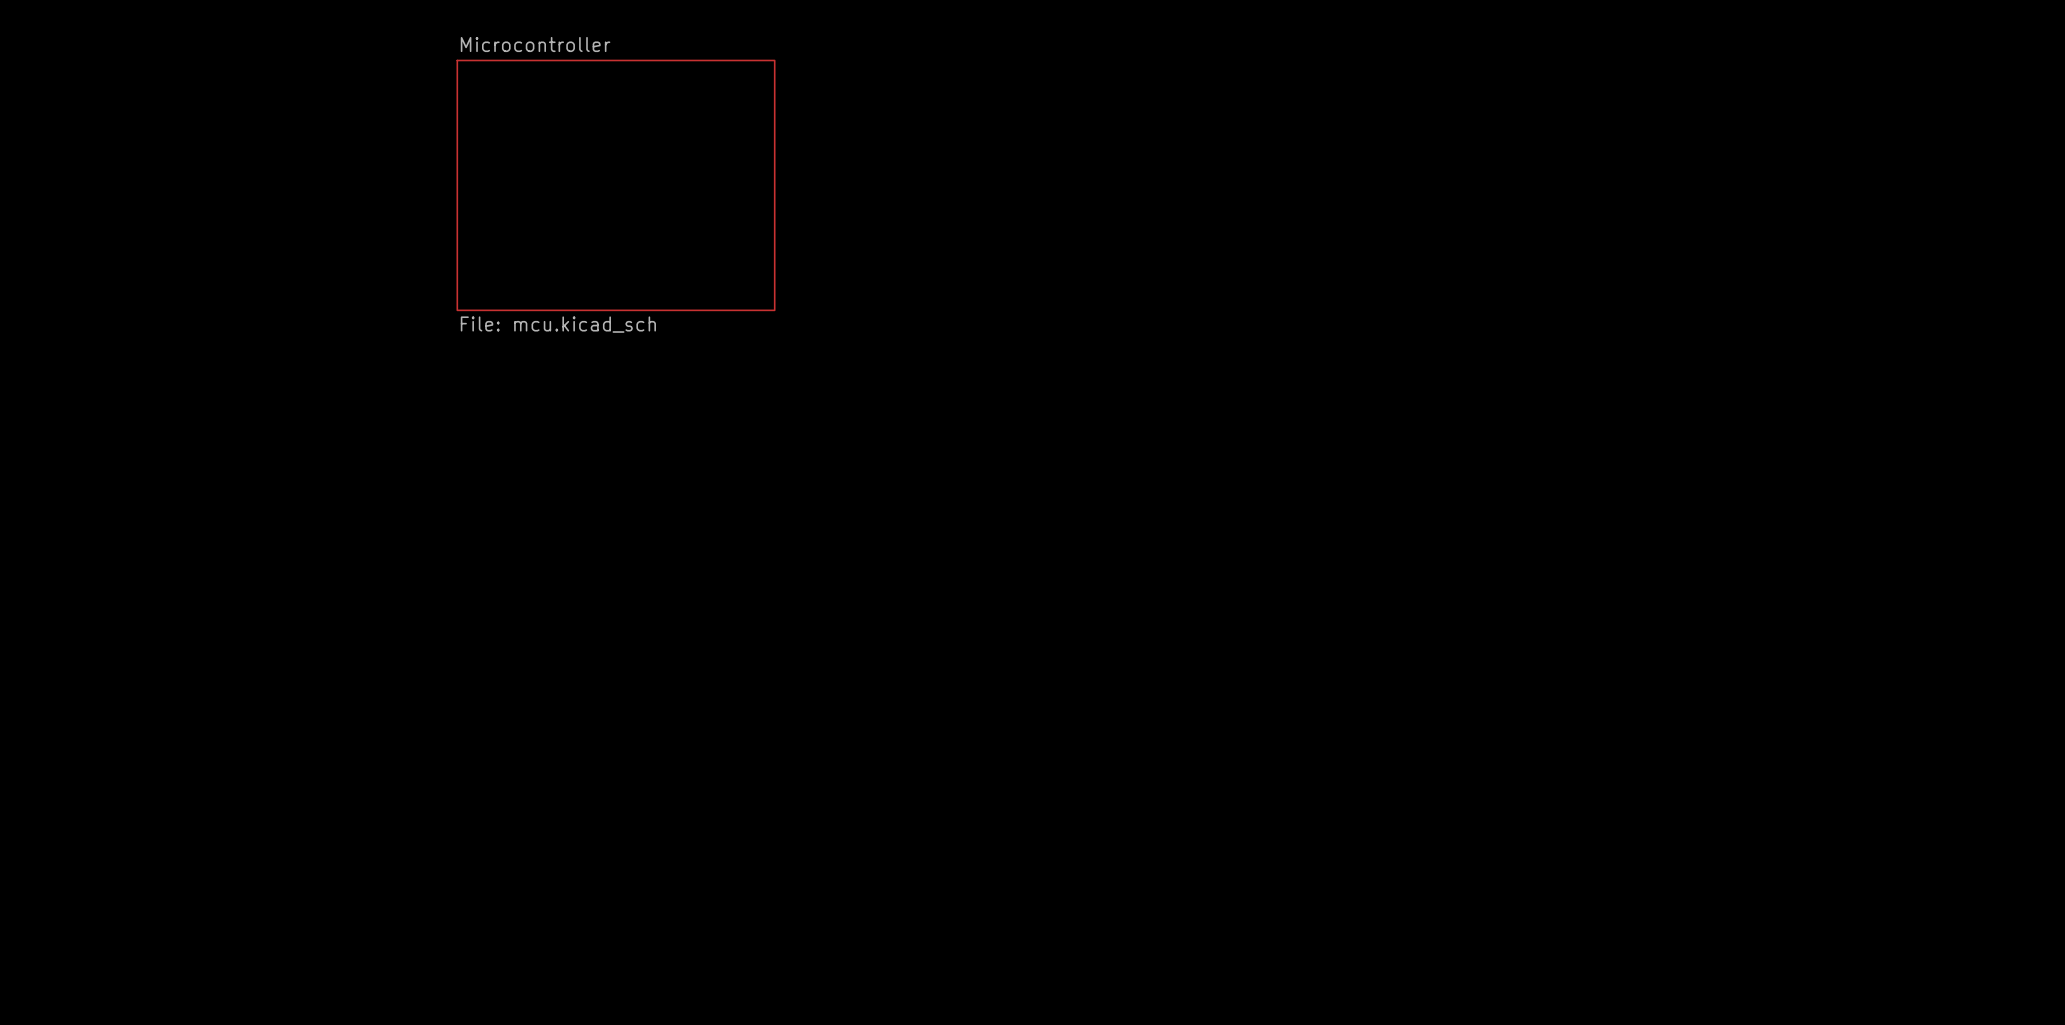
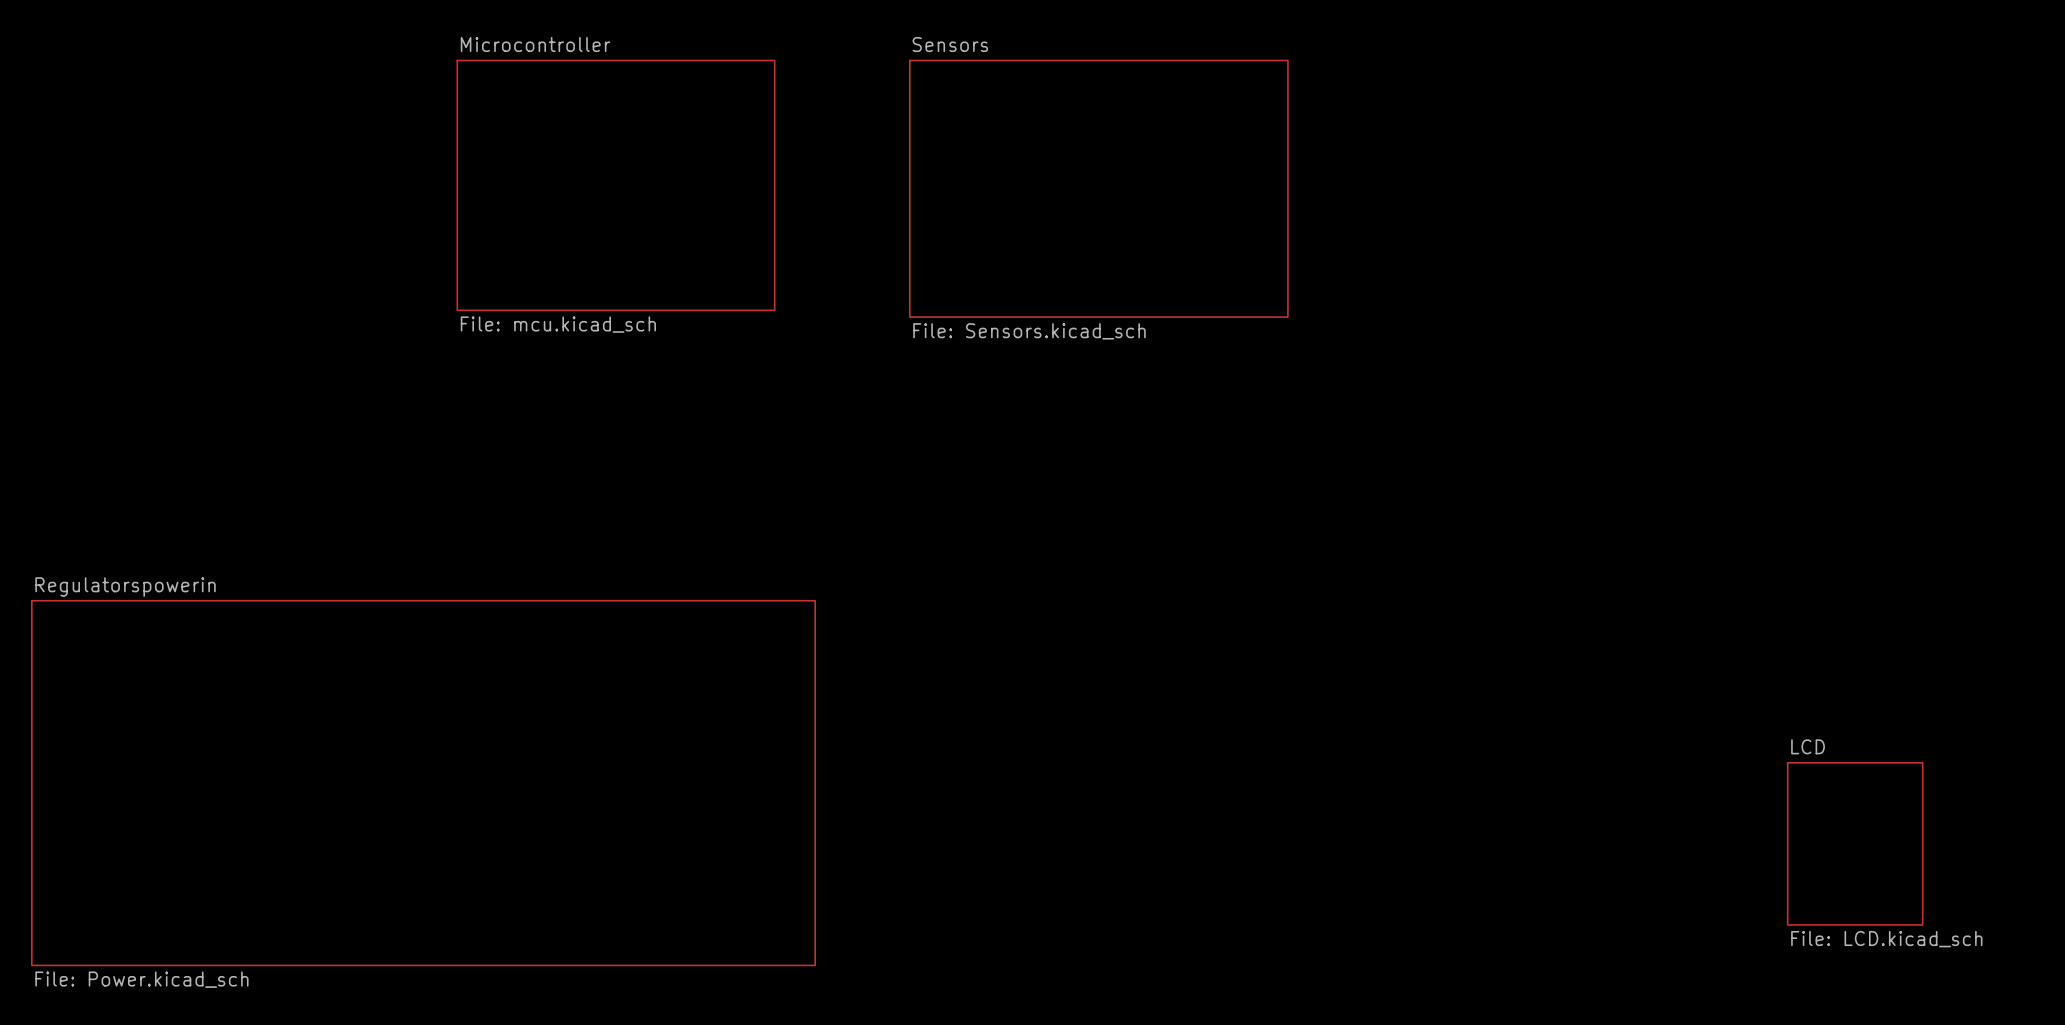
sheet Sensors: none -> File: Sensors.kicad_sch (1098, 188)
sheet Regulatorspowerin: none -> File: Power.kicad_sch (423, 783)
sheet LCD: none -> File: LCD.kicad_sch (1855, 843)

